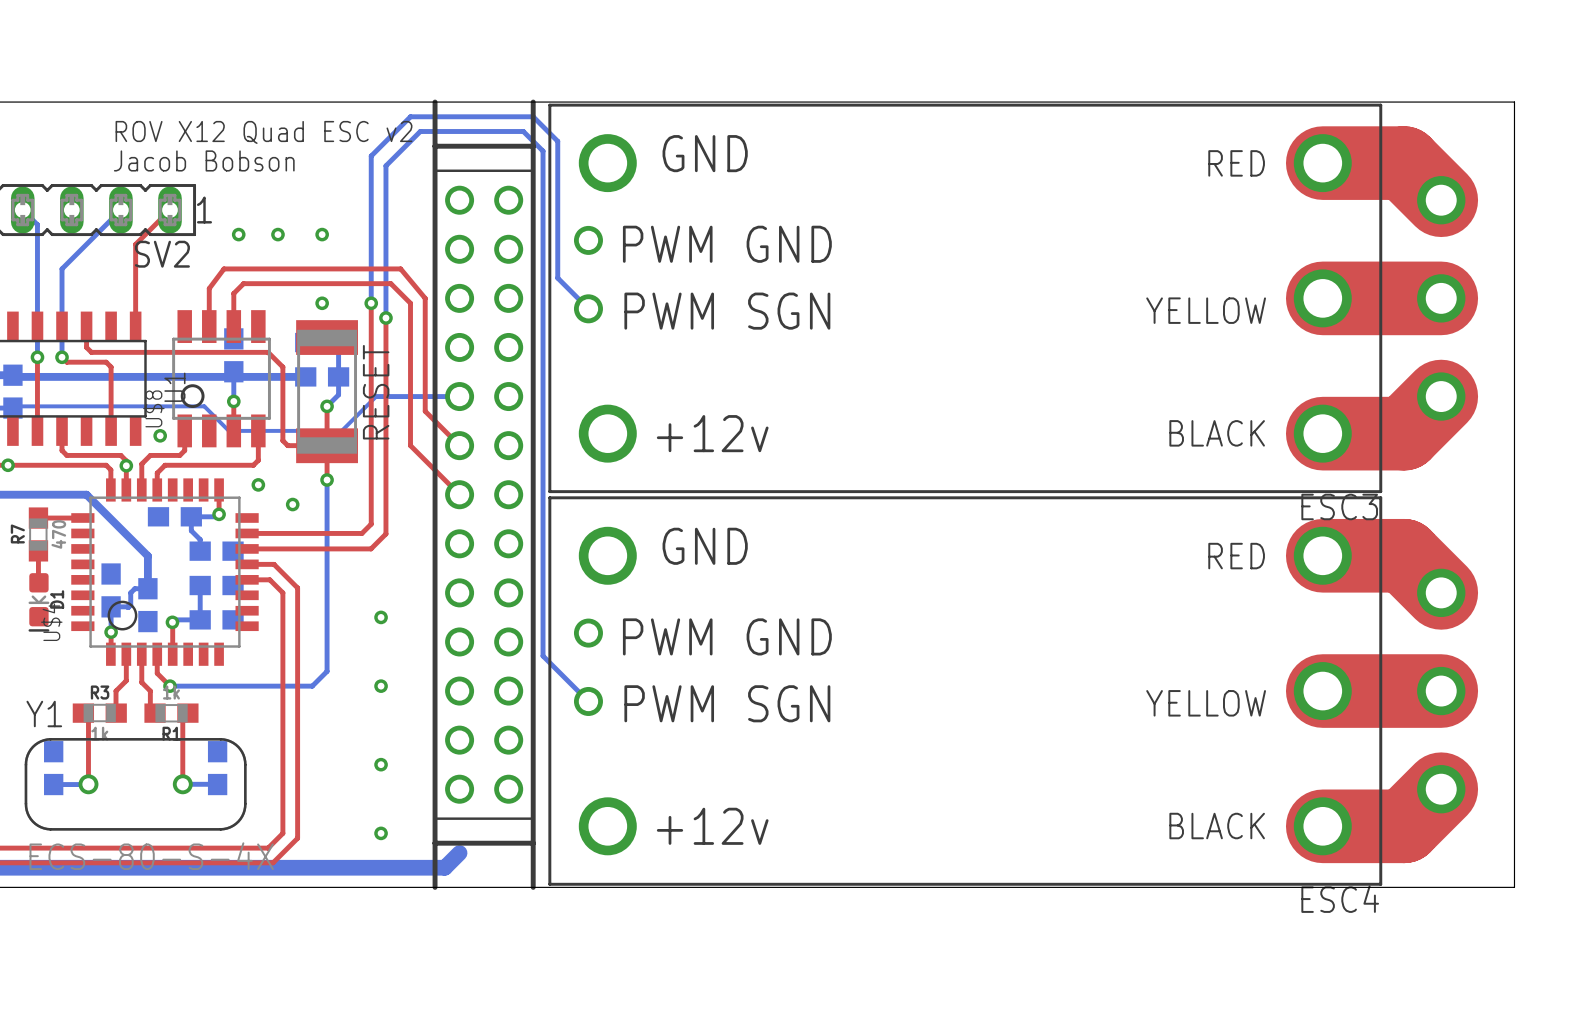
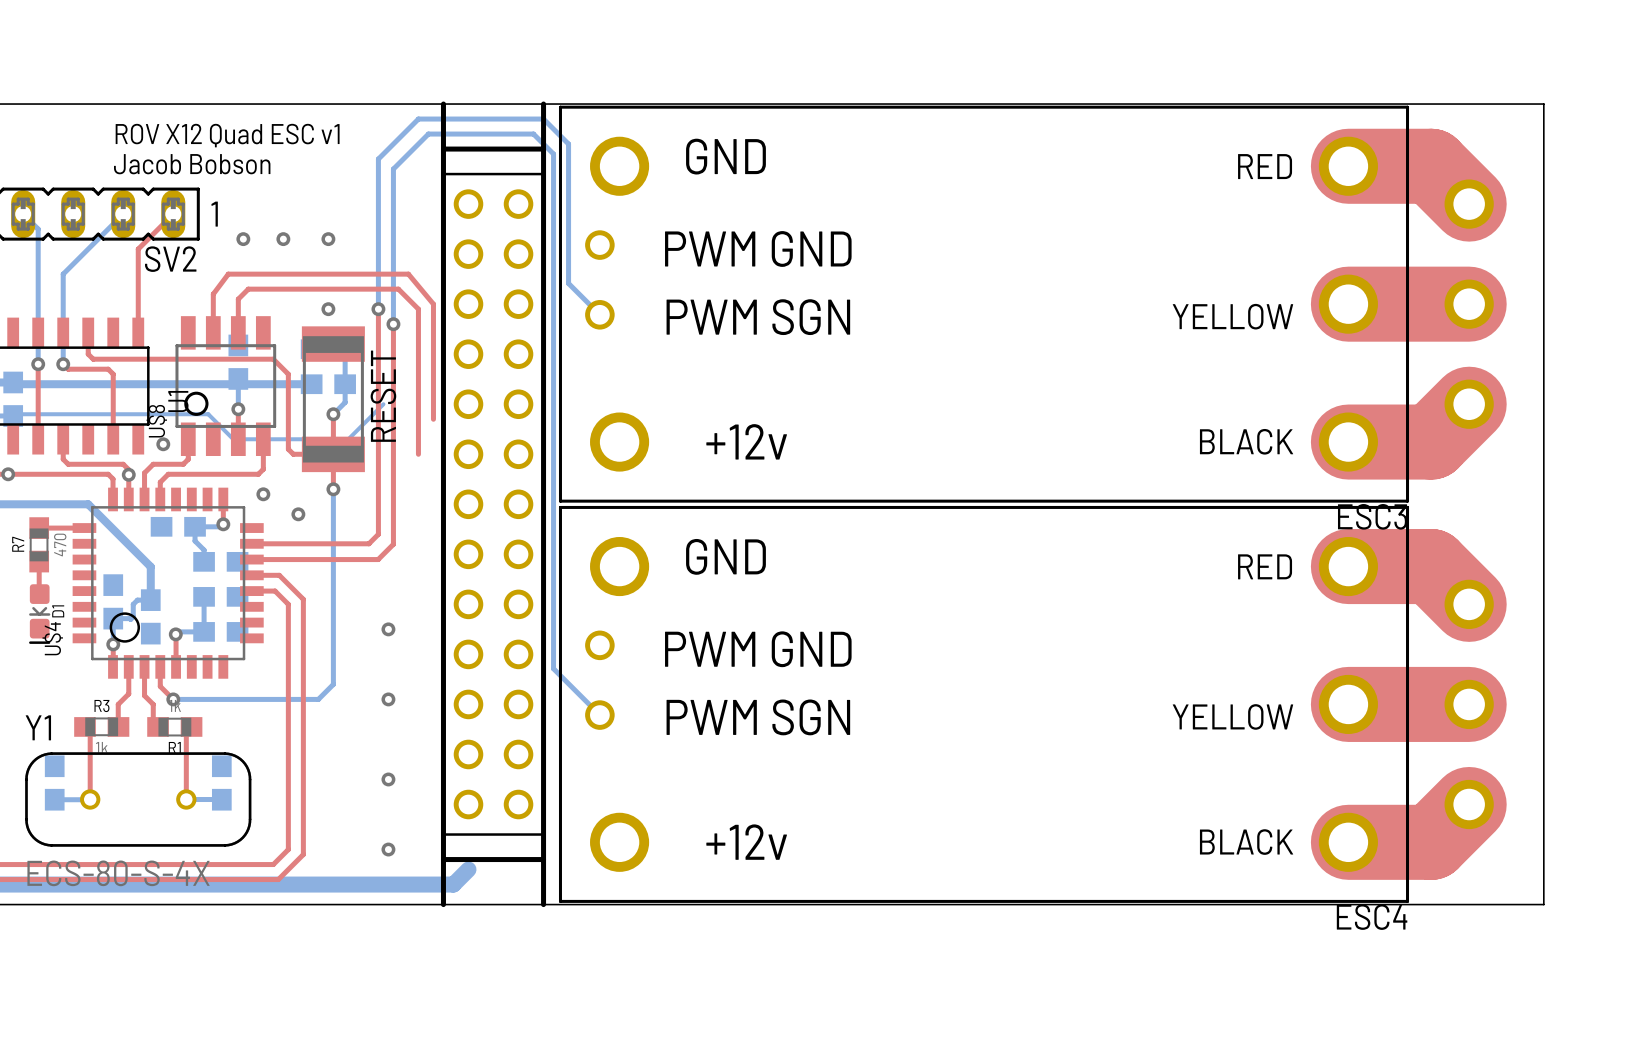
text: ROV X12 Quad ESC v2 (264, 132) -> ROV X12 Quad ESC v1 (227, 135)
bottom track: (376, 396) (459, 396) -> none
top track: (425, 411) (459, 445) -> none
top track: (410, 445) (459, 494) -> none

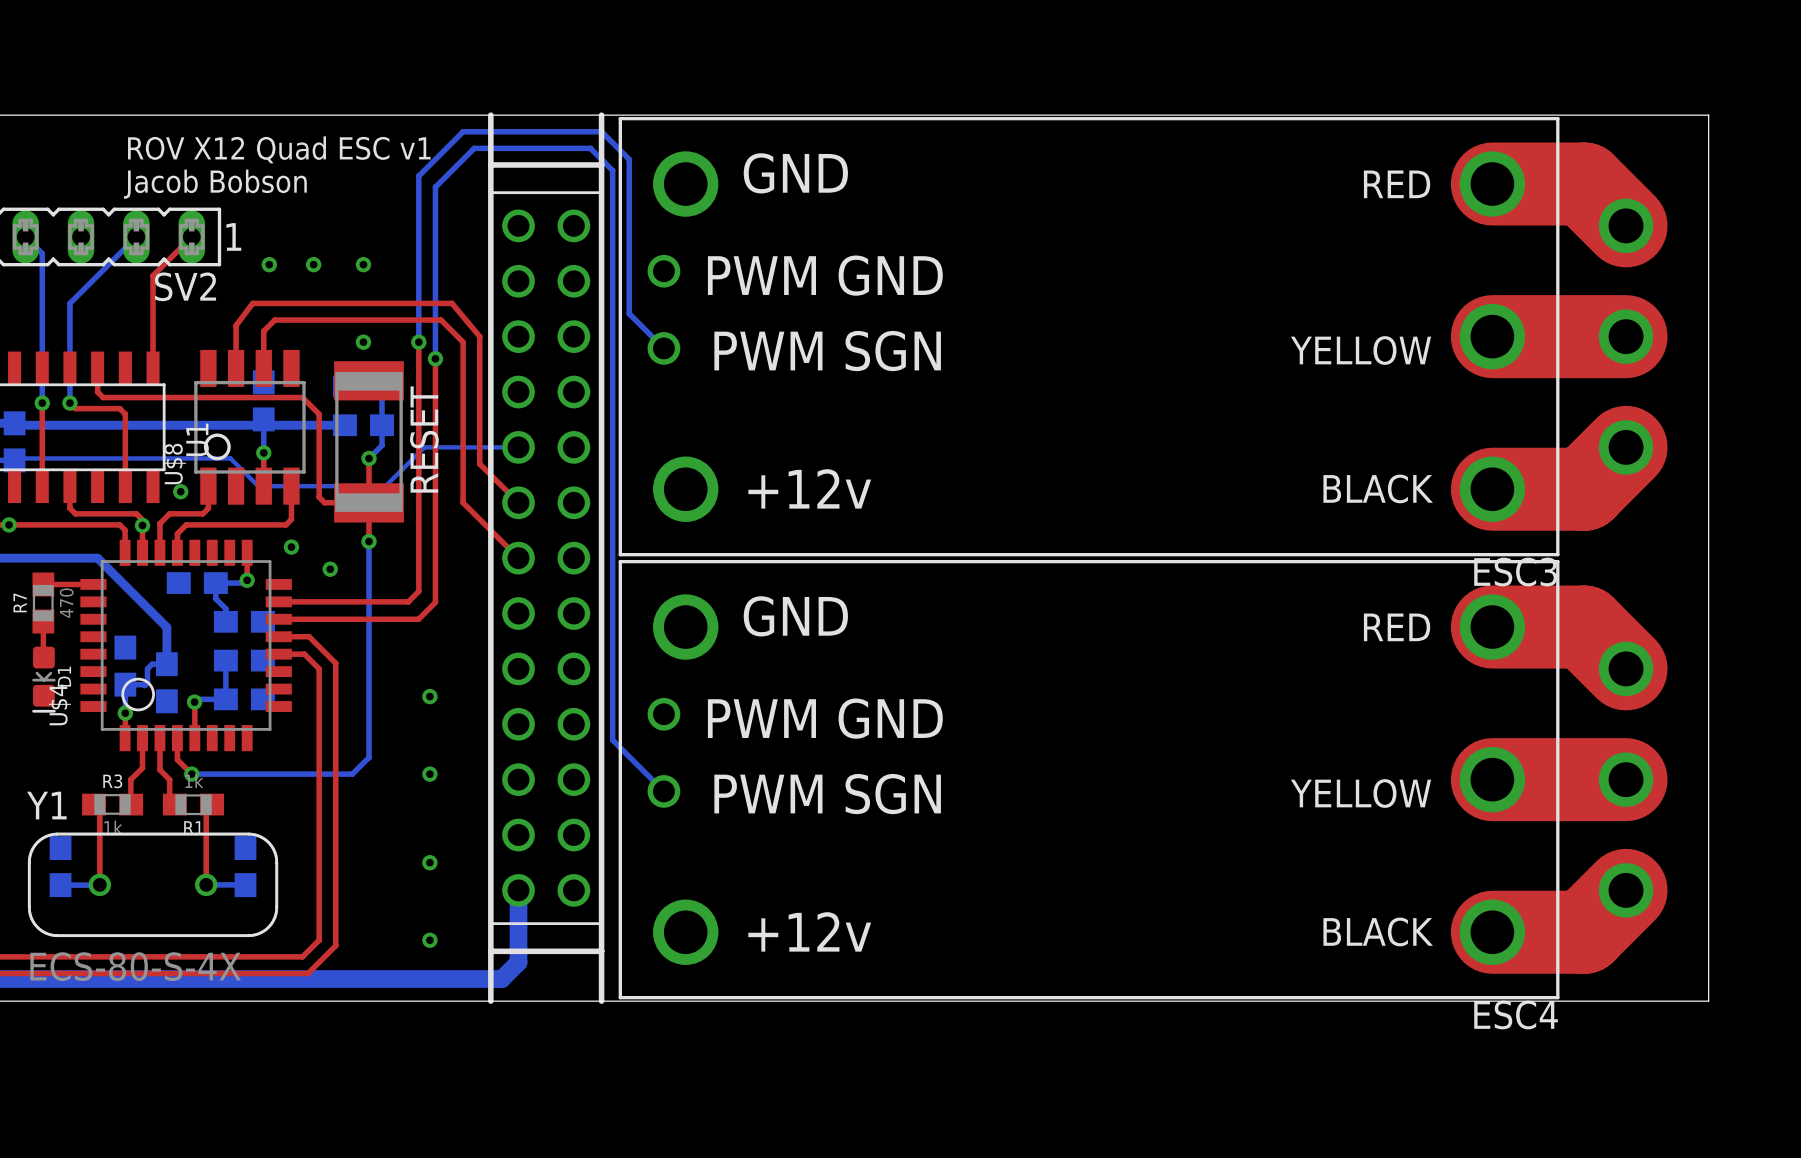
bottom track: none -> (424, 447) (518, 447)
top track: none -> (479, 464) (518, 502)
top track: none -> (463, 502) (518, 558)
bottom track: none -> (518, 890) (518, 962)

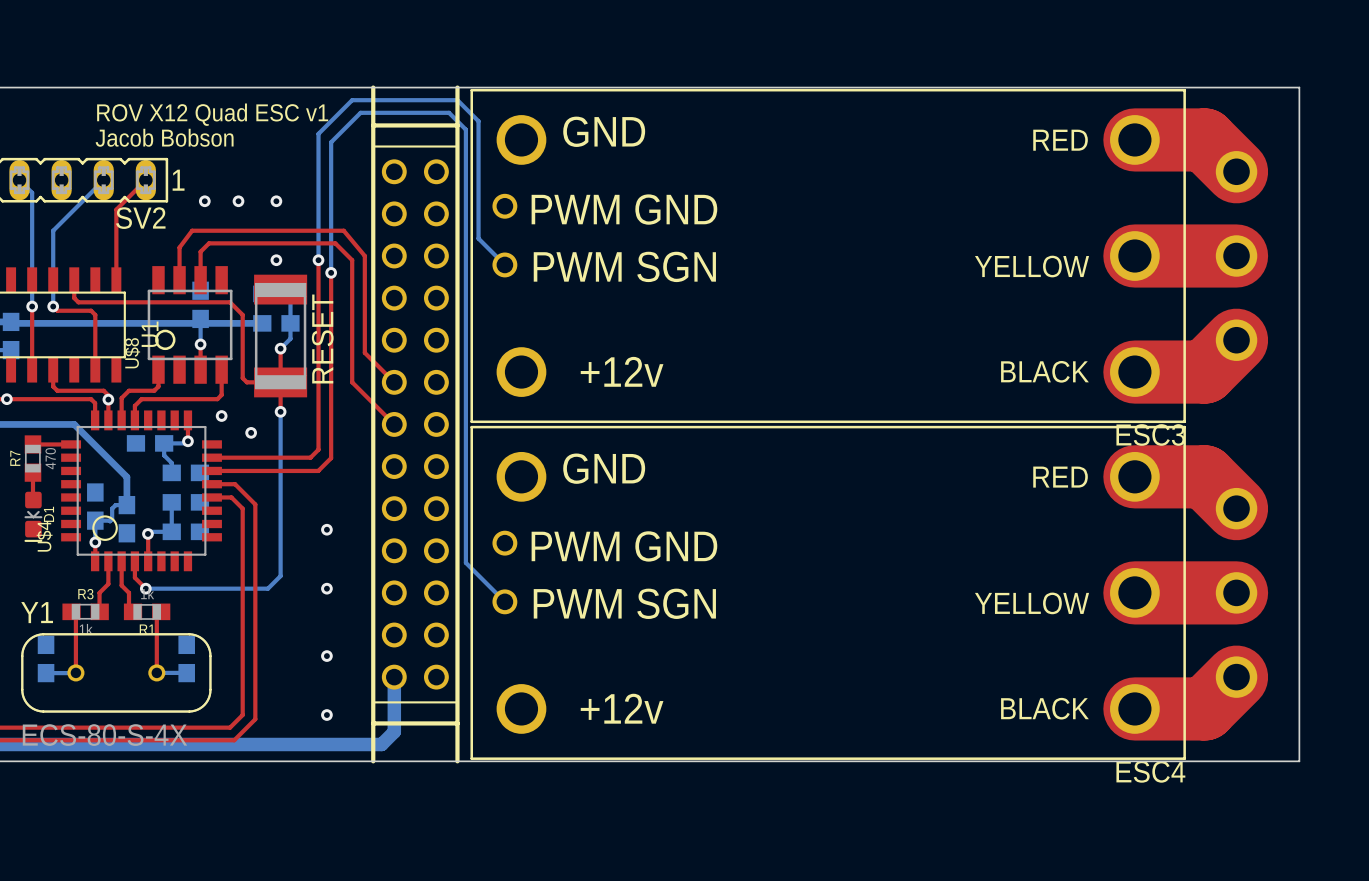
bottom track: (518, 447) (424, 447) (385, 486) (258, 486) (230, 458) (16, 458) (14, 460) -> none
via: (180, 491) -> none

